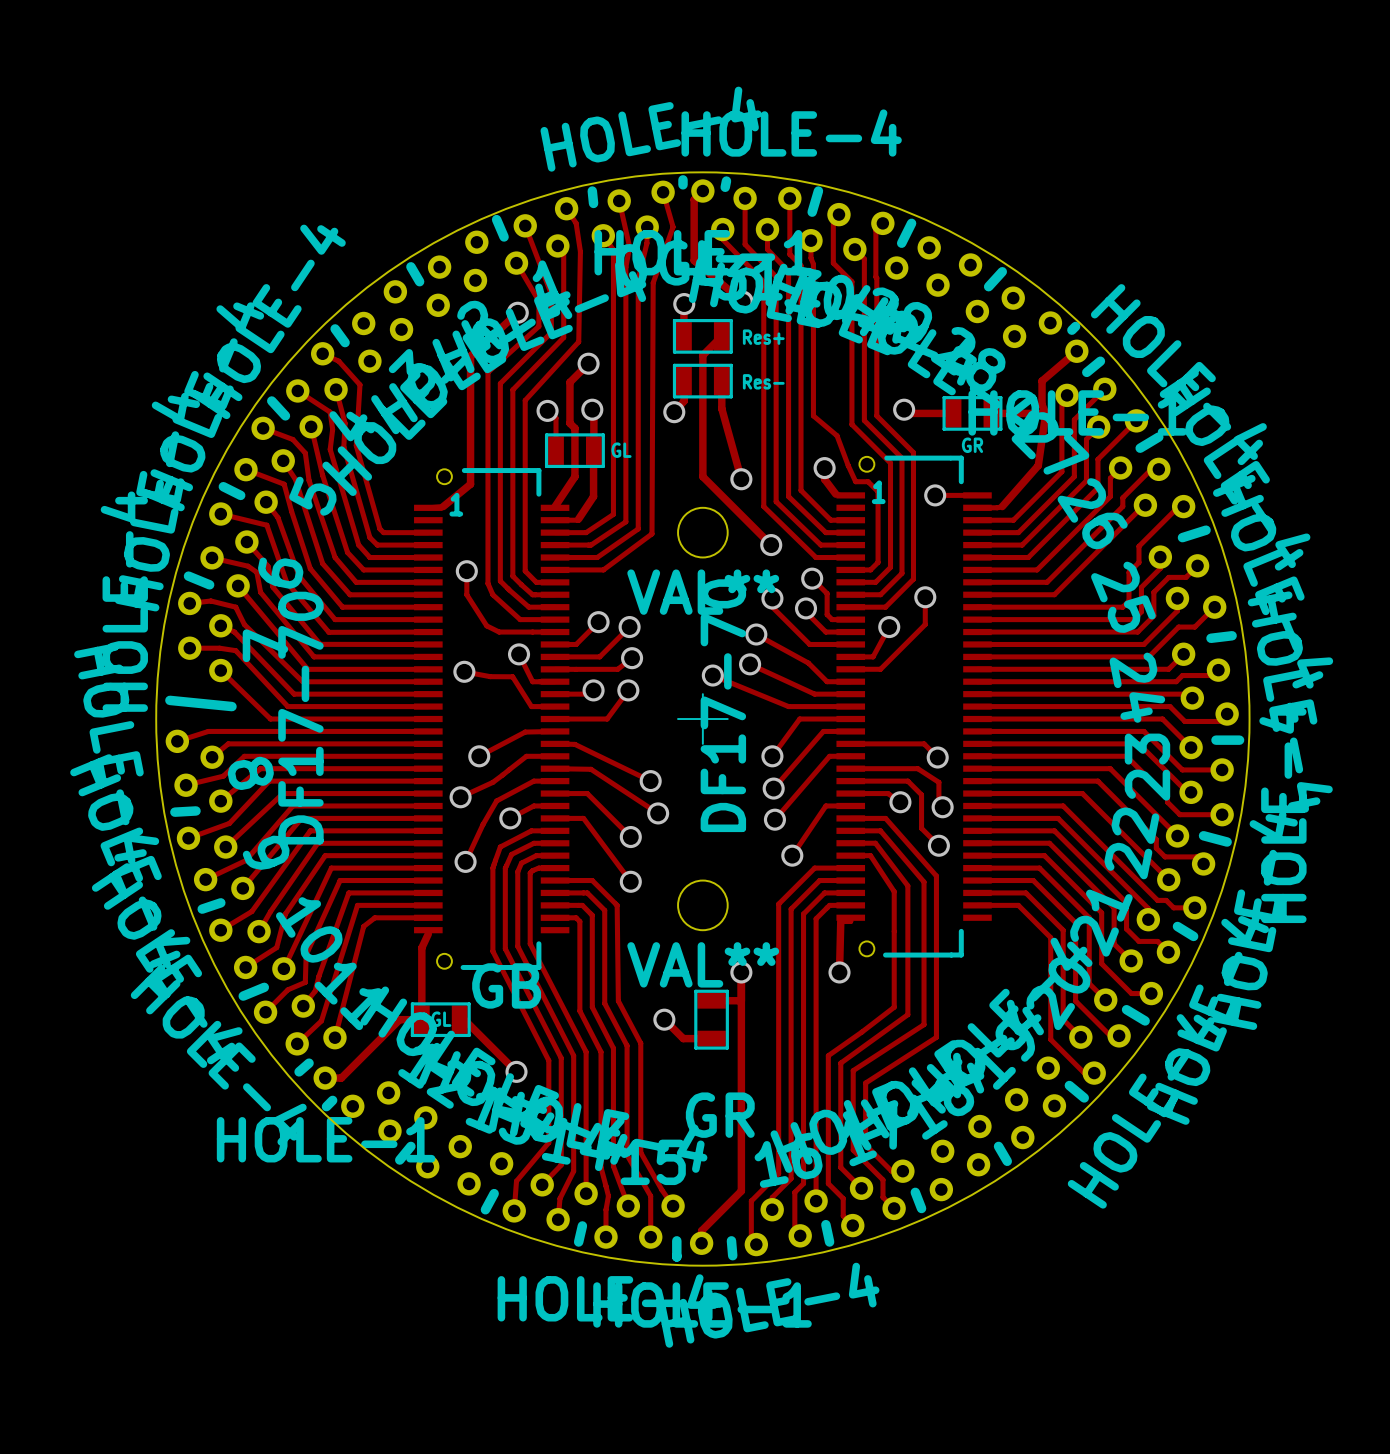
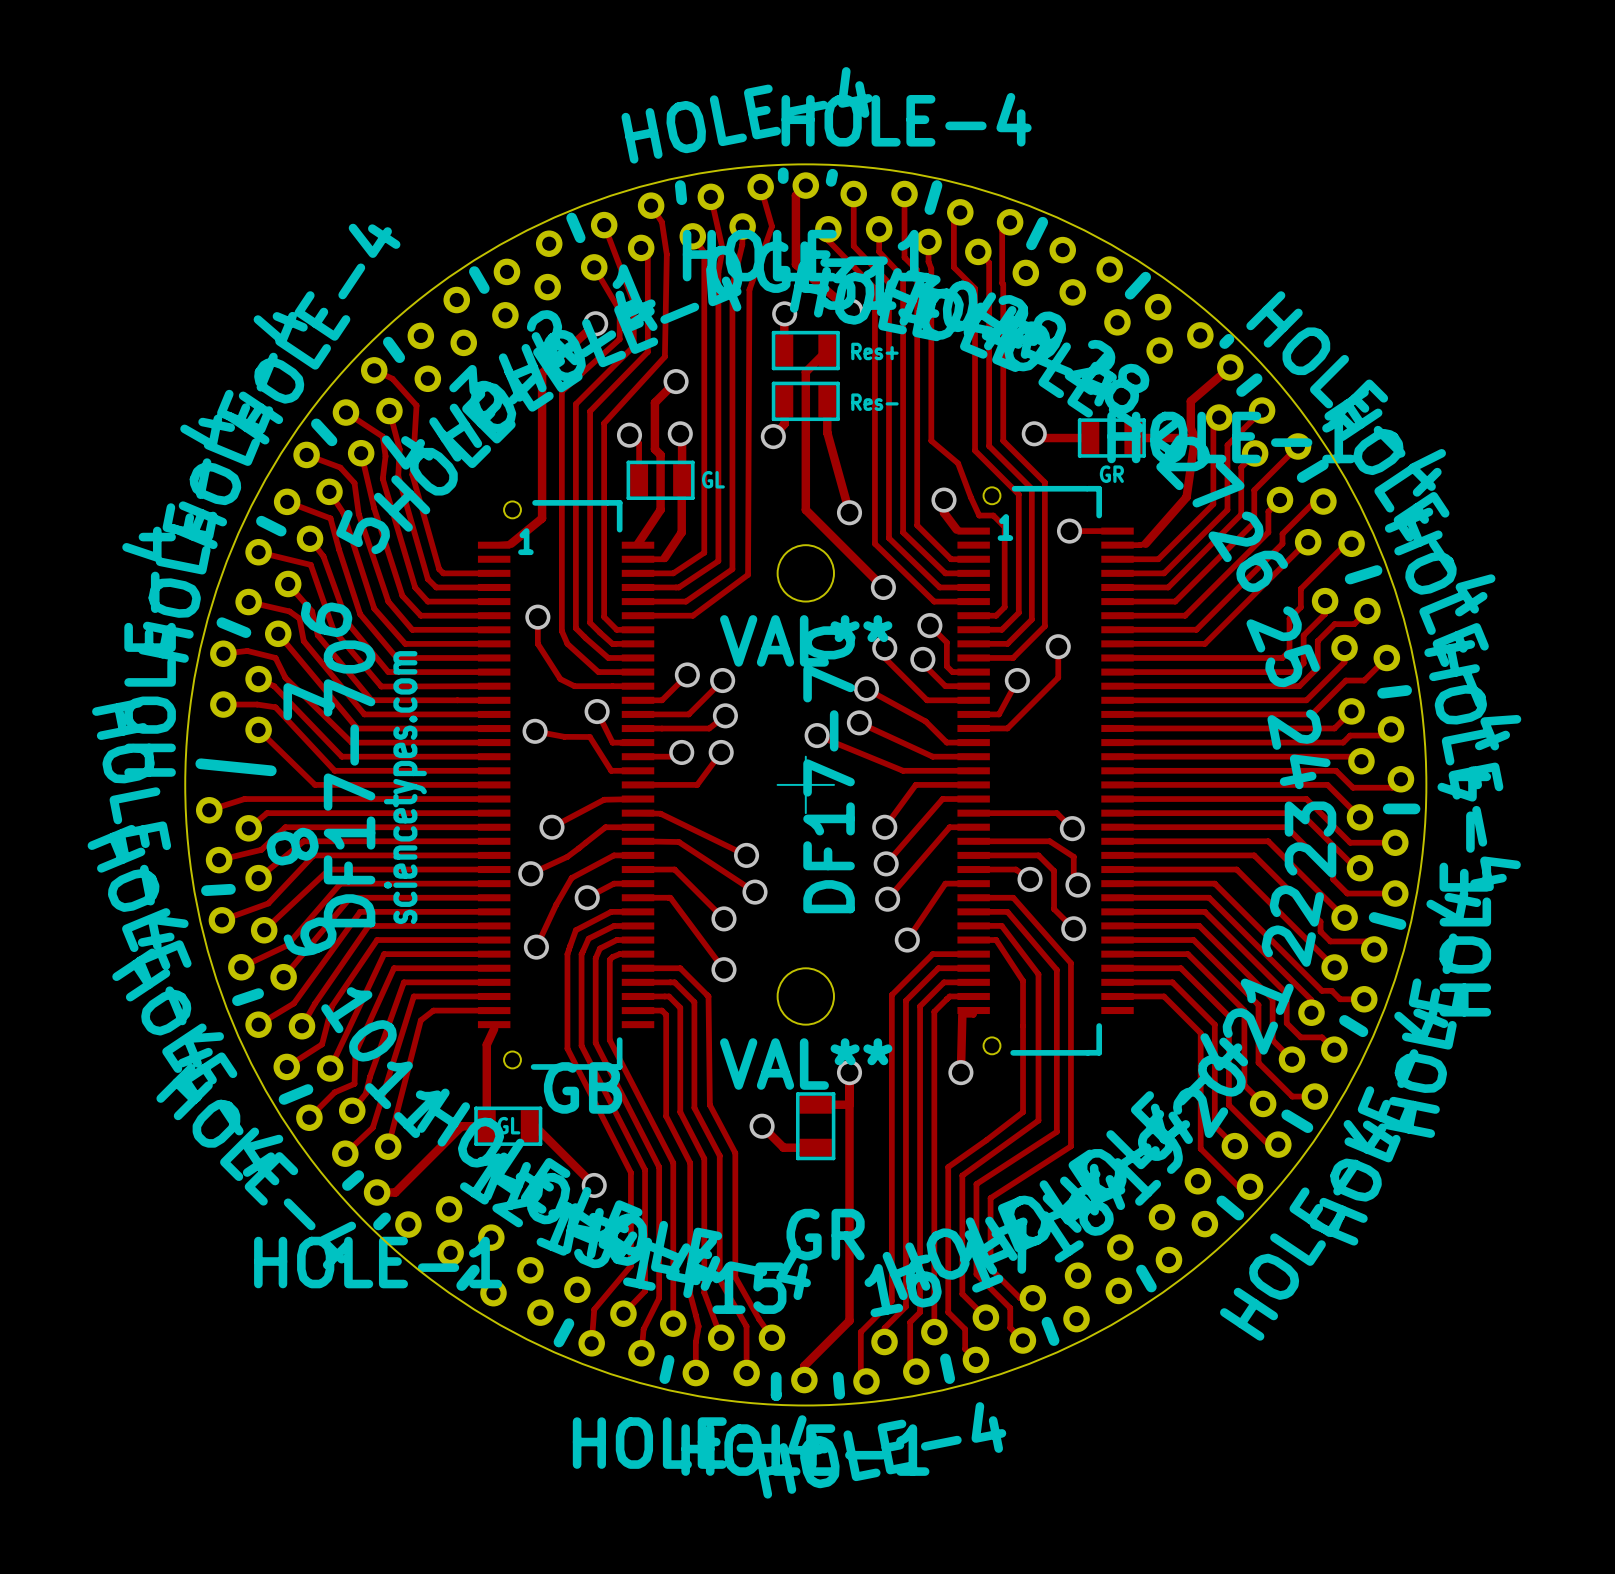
text: none -> sciencetypes.com (405, 787)

